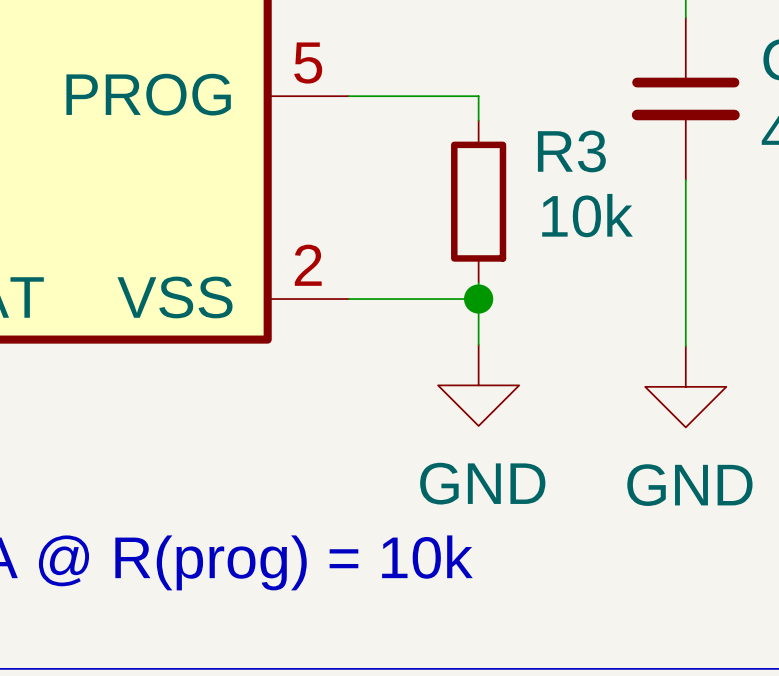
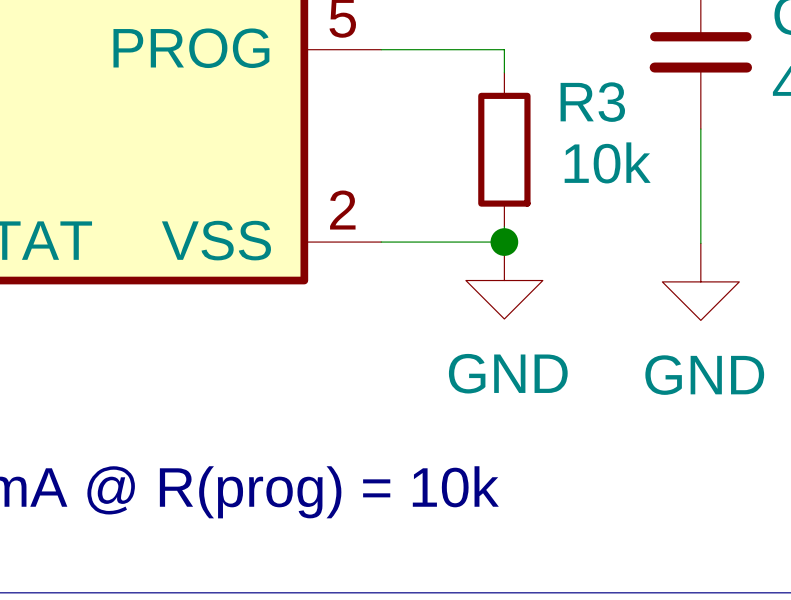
power symbol position: GND (478, 385) -> GND (504, 280)
power symbol position: GND (685, 386) -> GND (700, 281)

